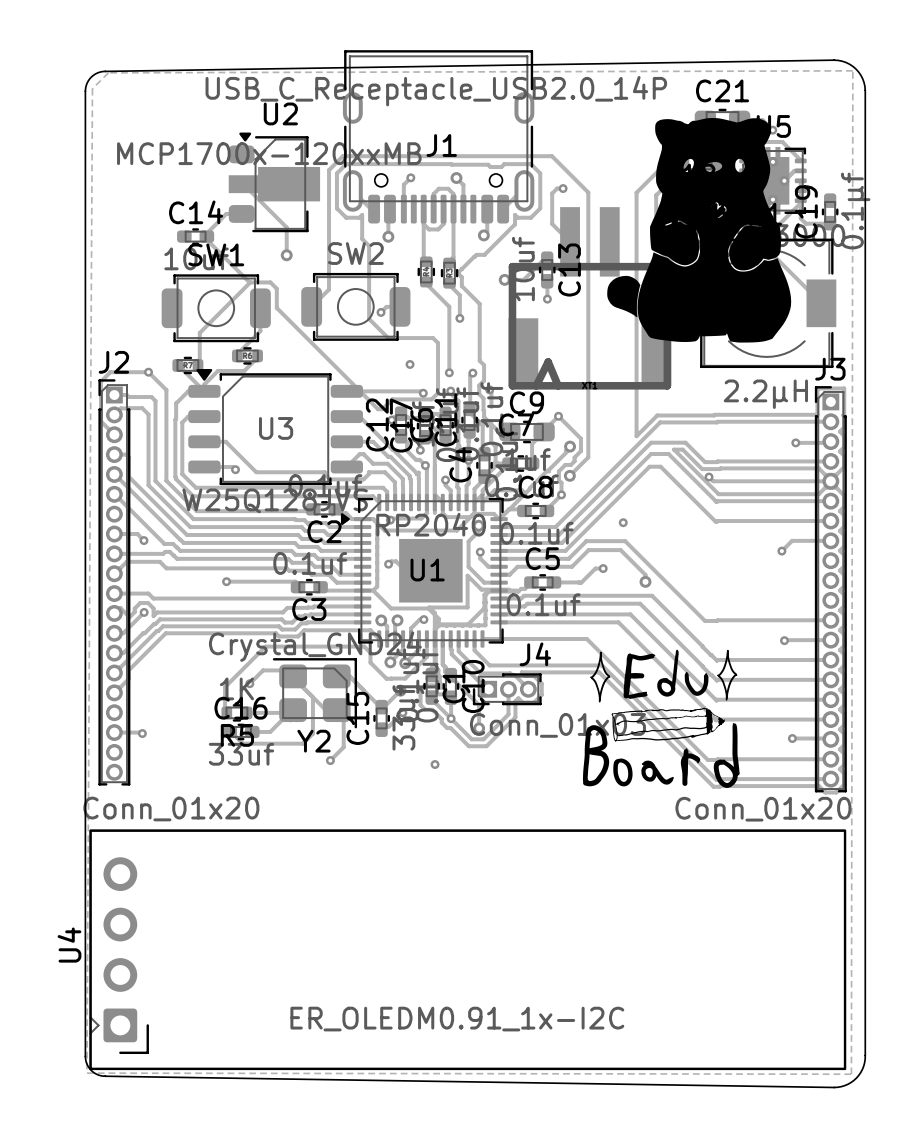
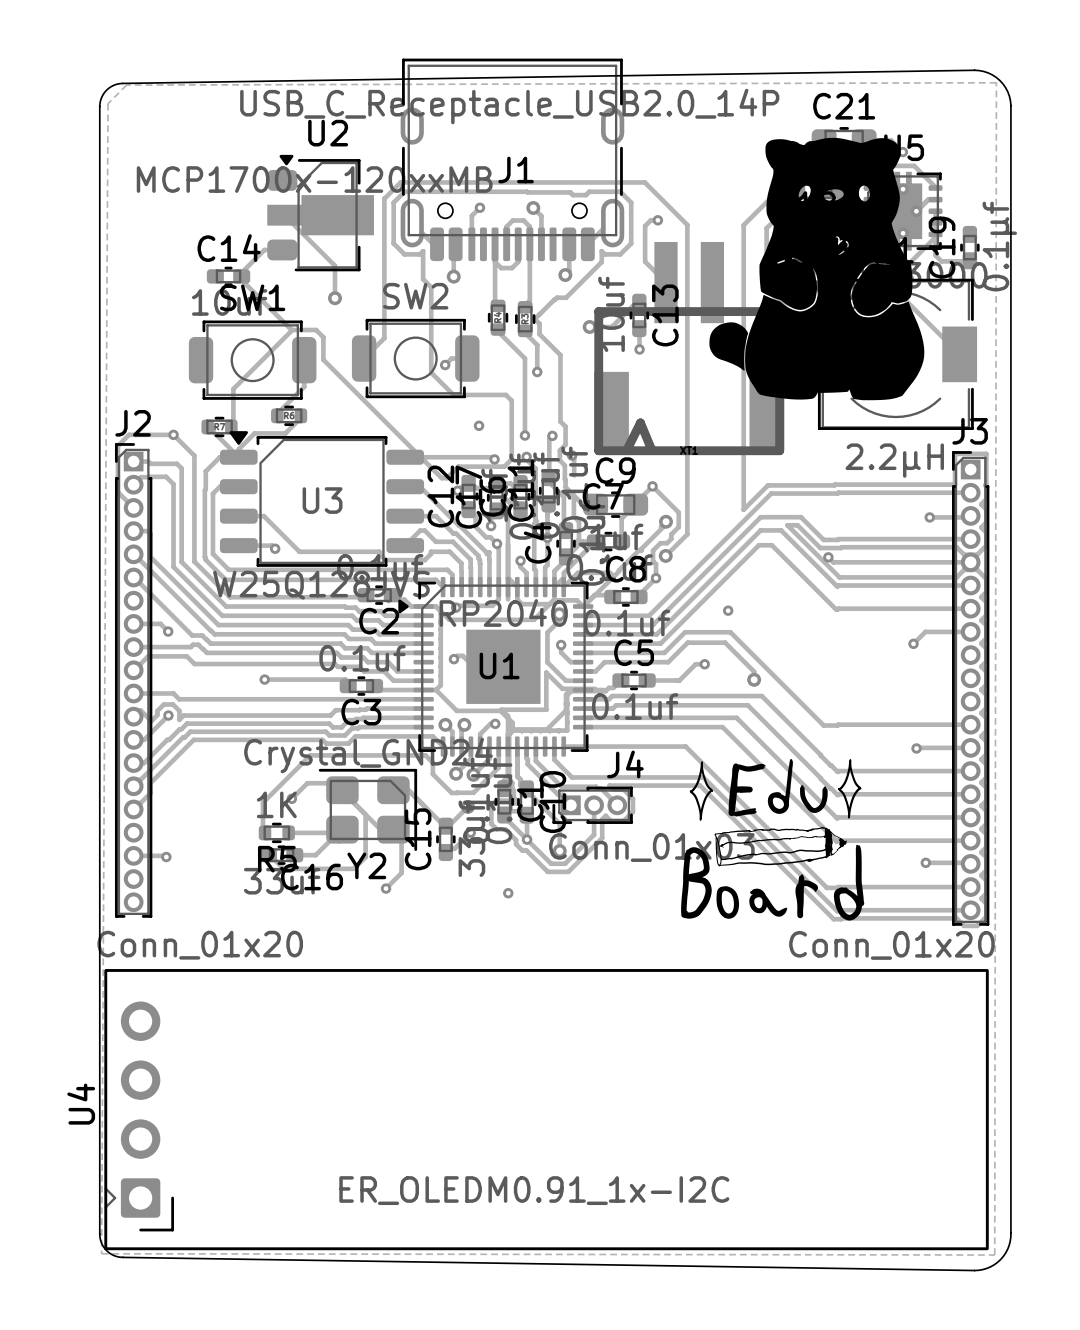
C16 name position: C16 (241, 708) -> C16 (312, 877)

